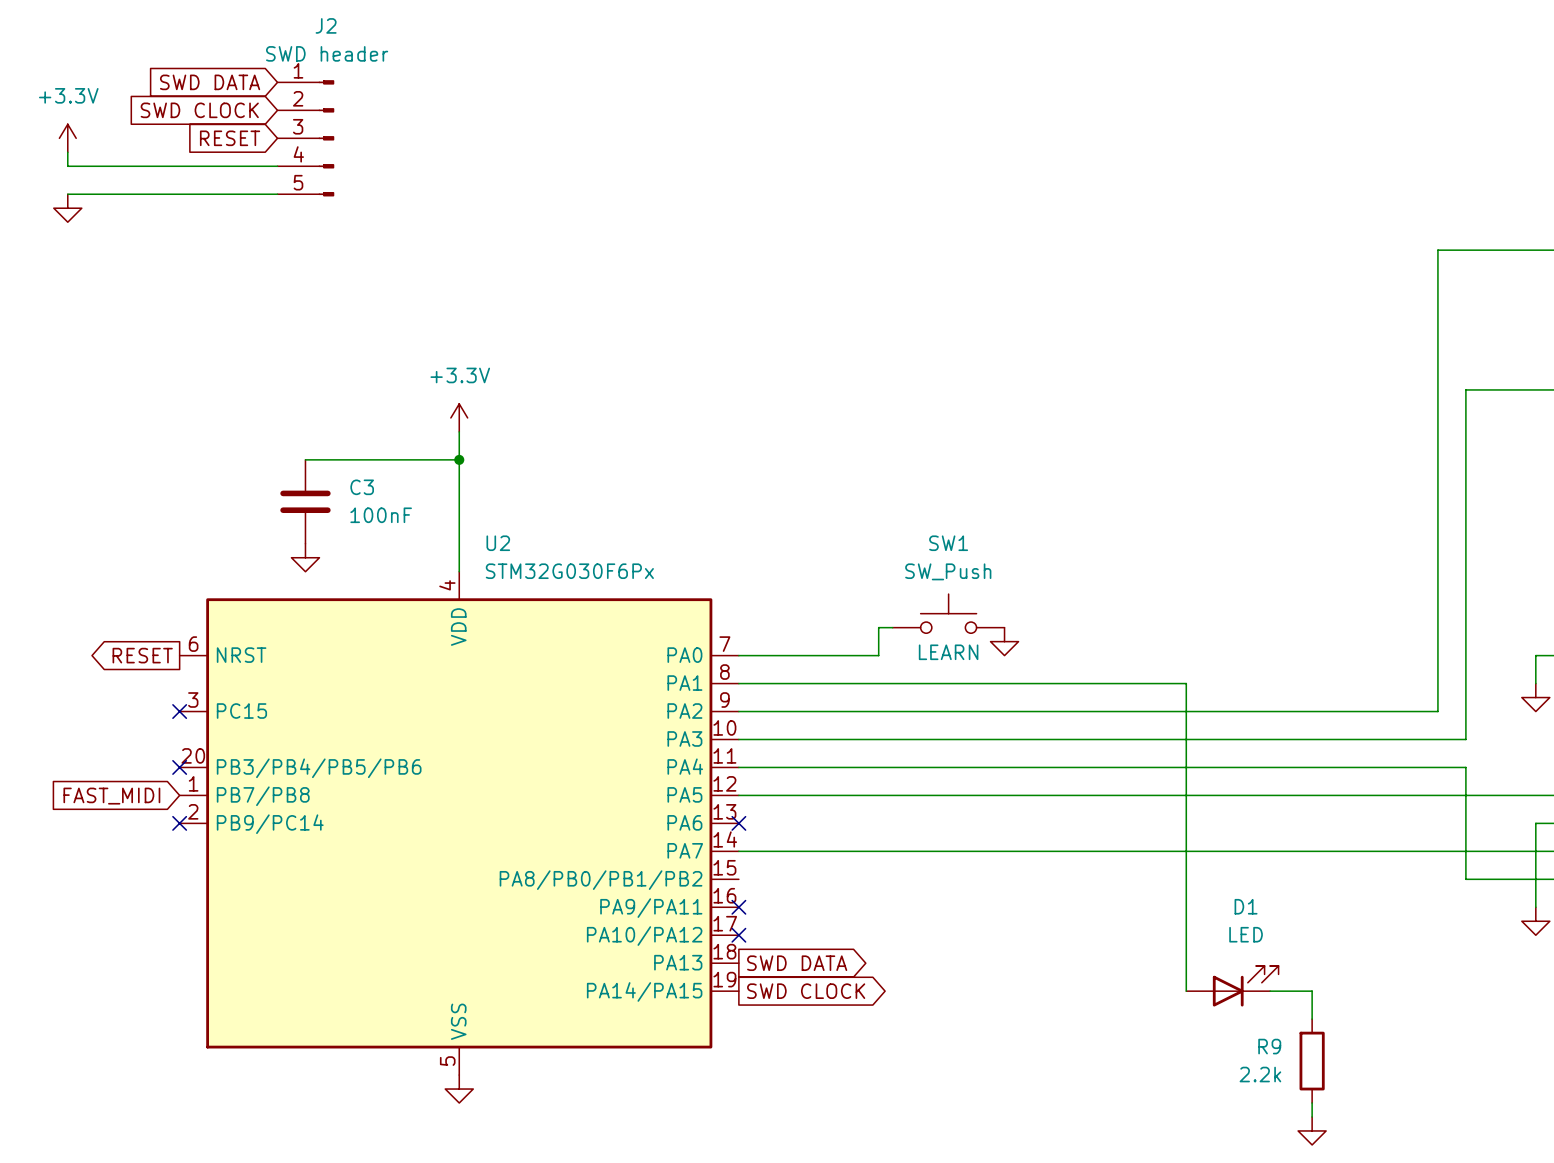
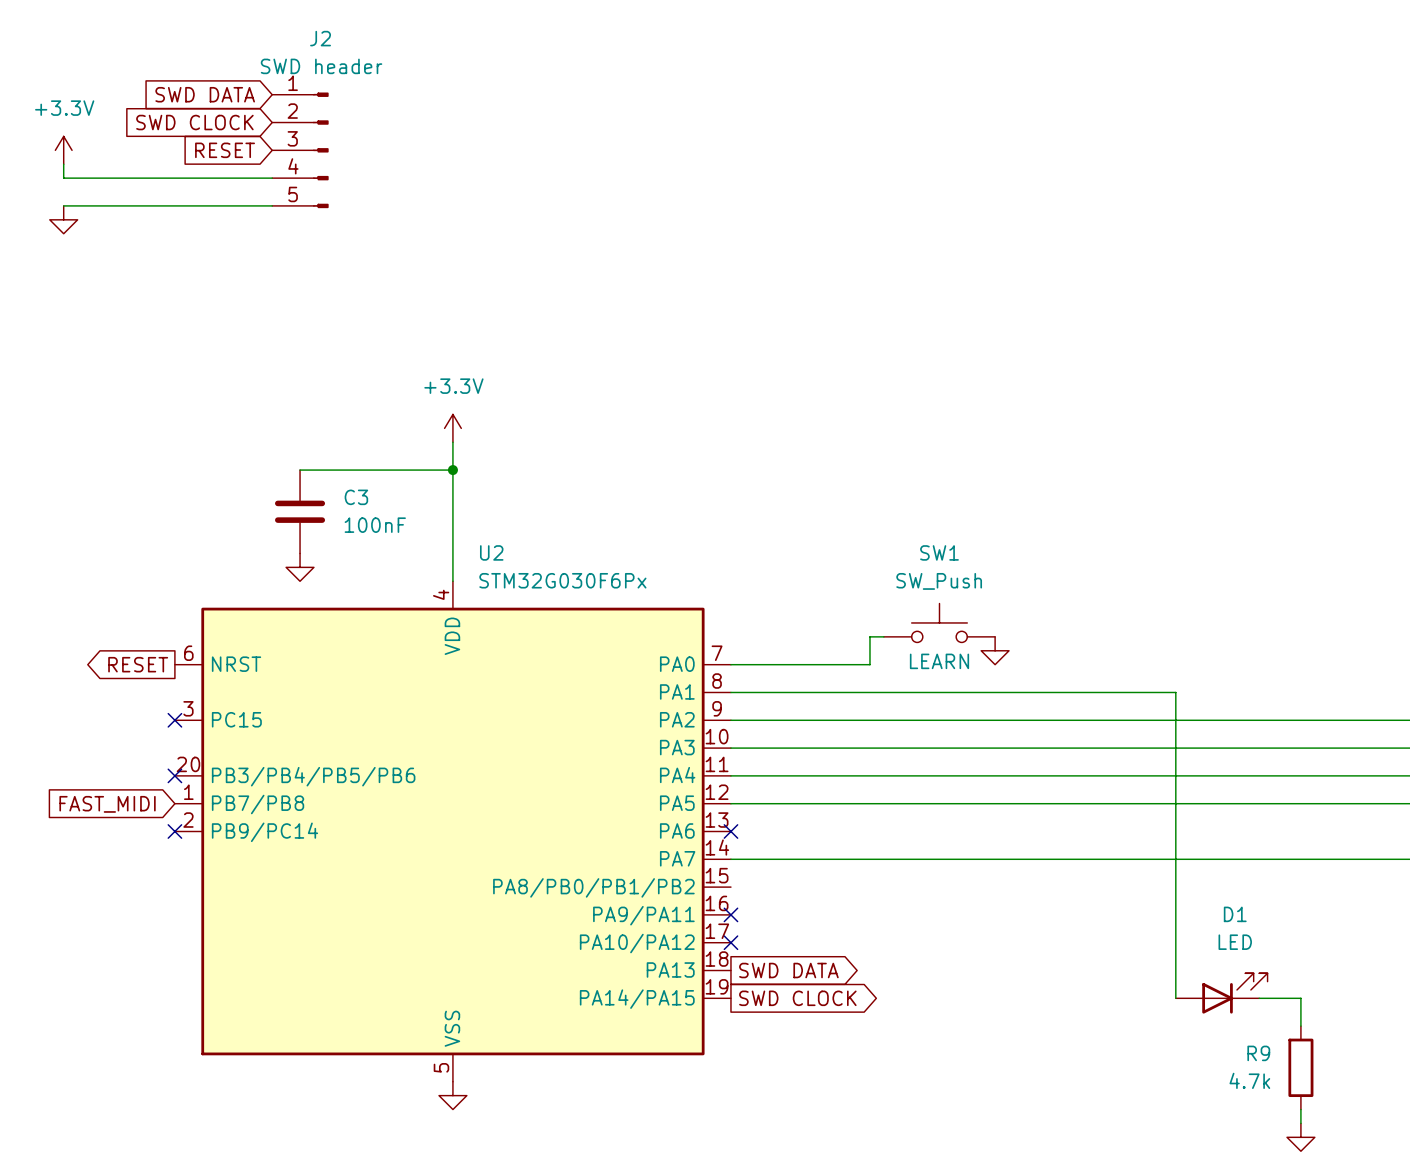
R9 value: 2.2k (1260, 1074) -> 4.7k (1249, 1080)

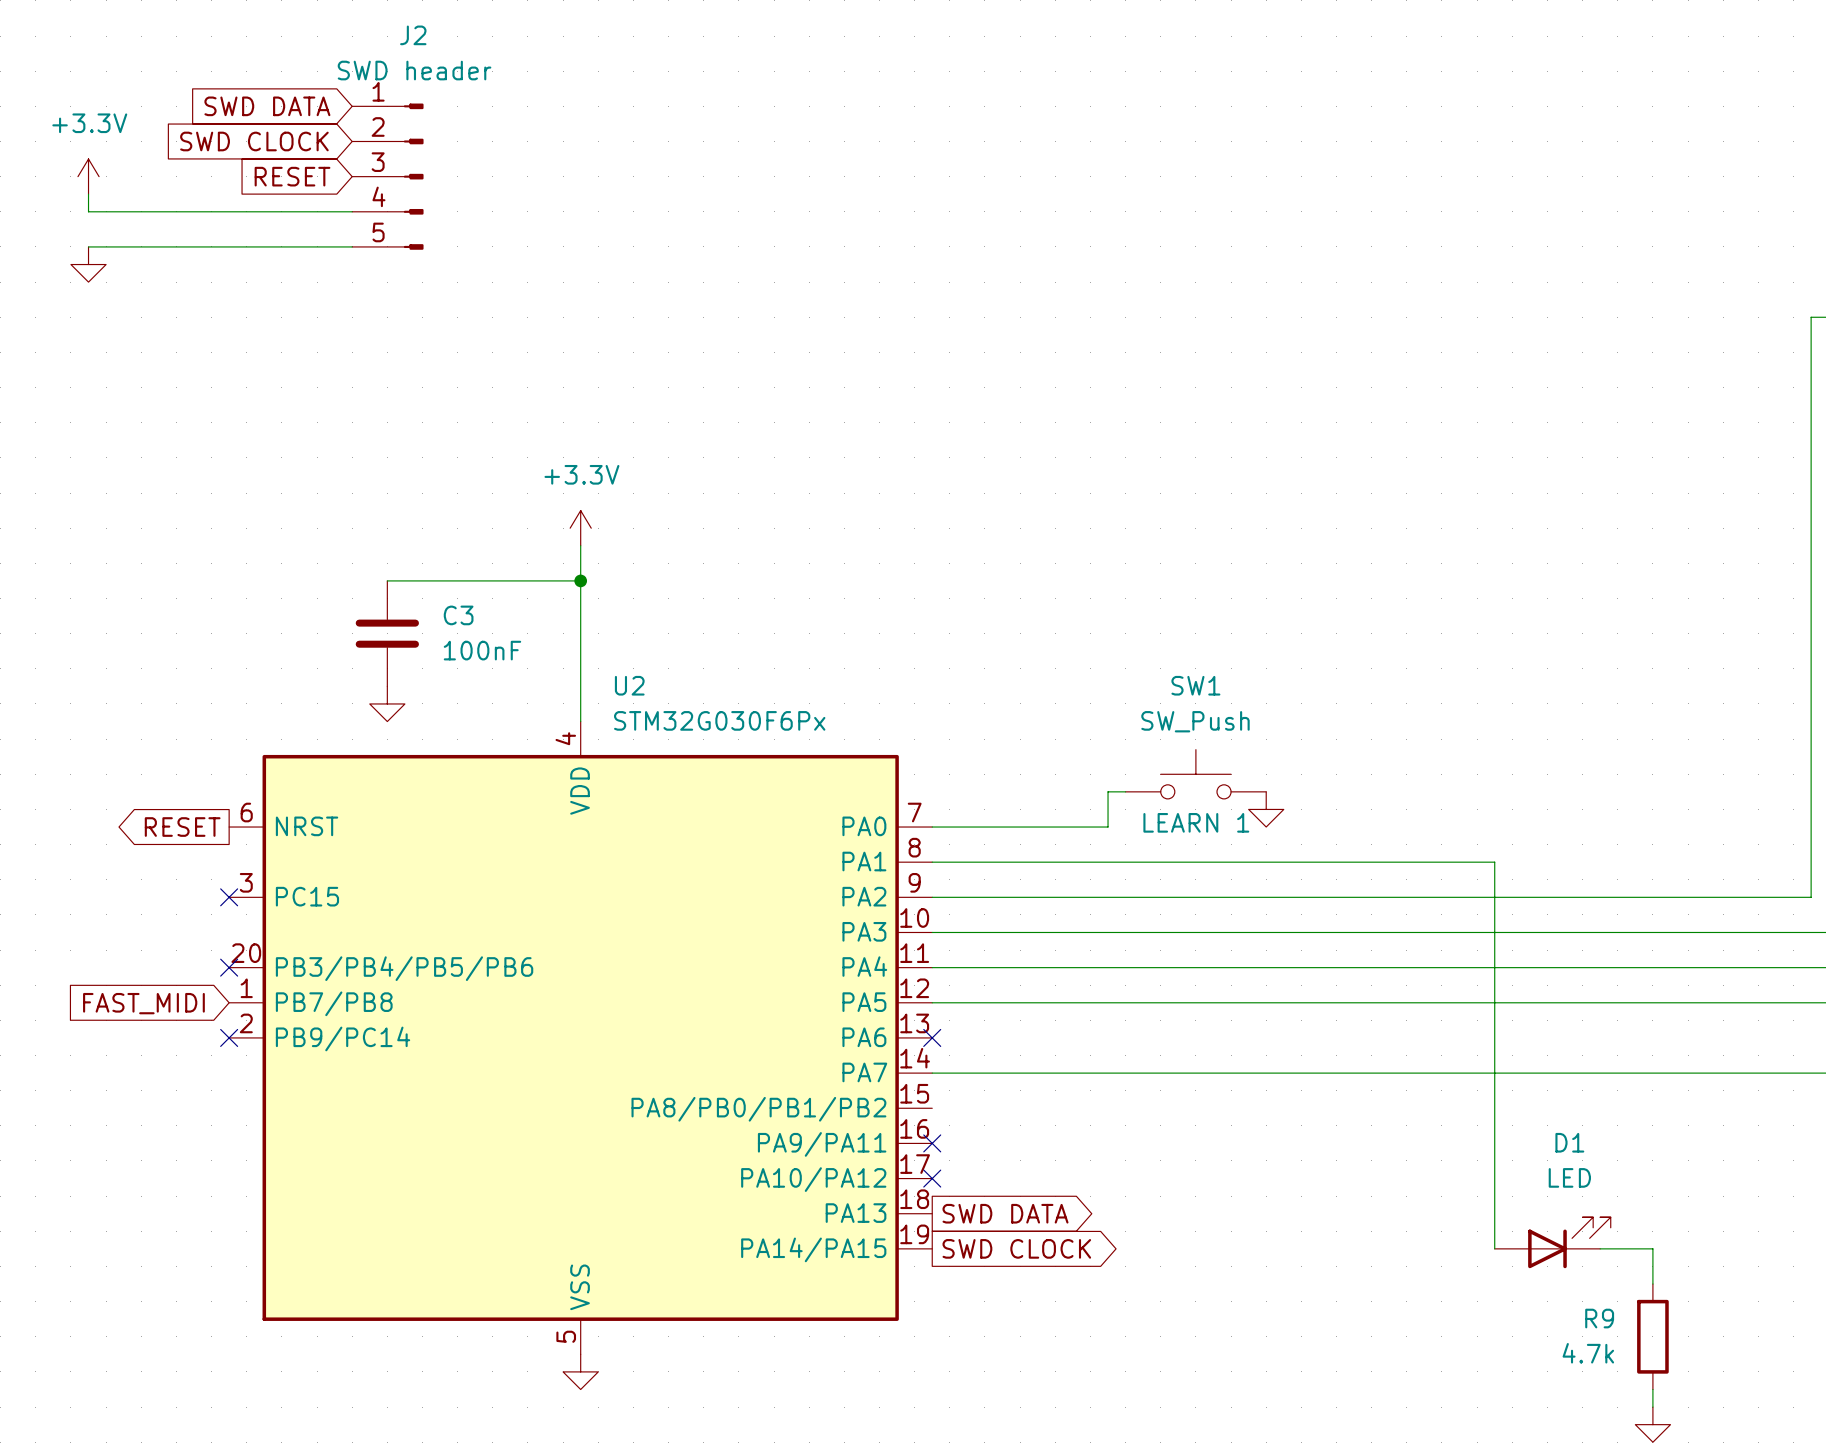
SW1 text: LEARN (939, 661) -> LEARN 1 (1196, 822)

